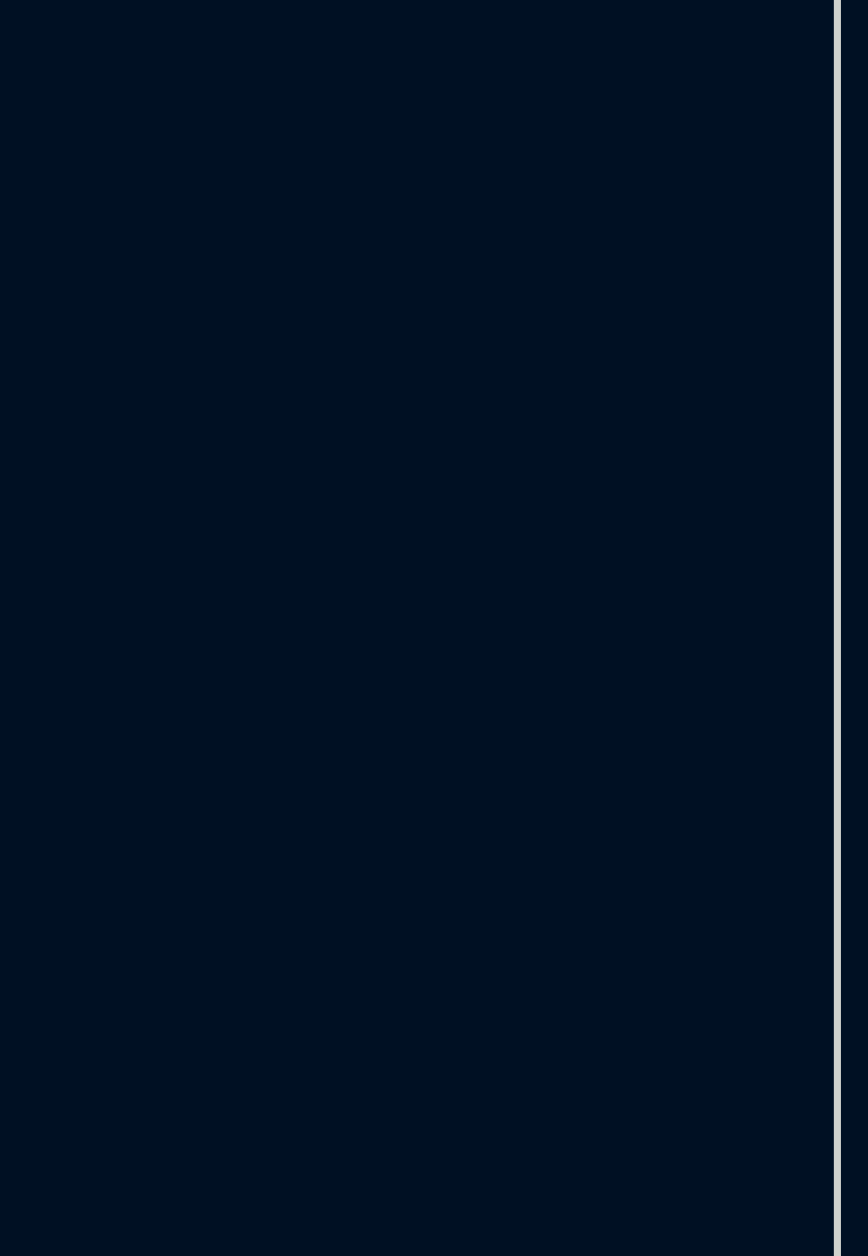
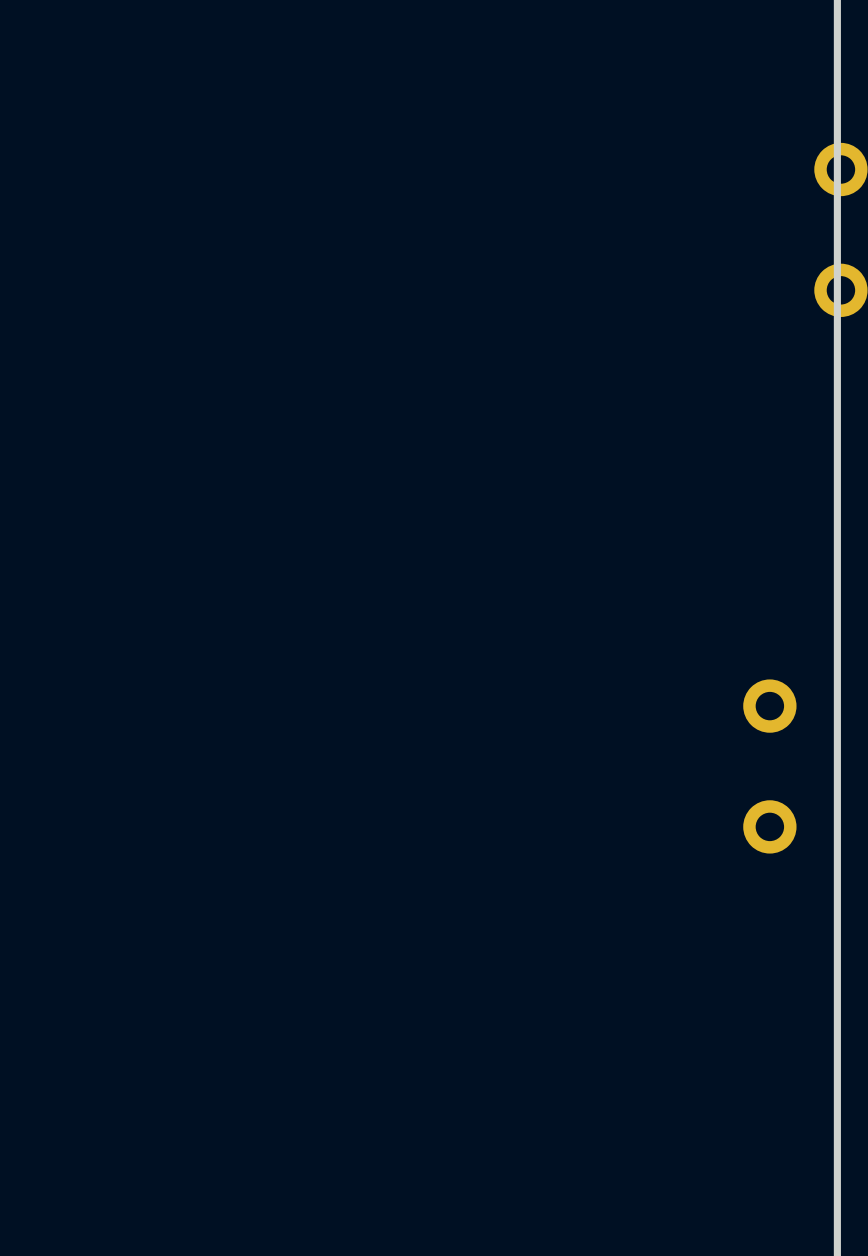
part: none -> (840, 229)
part: none -> (769, 766)

